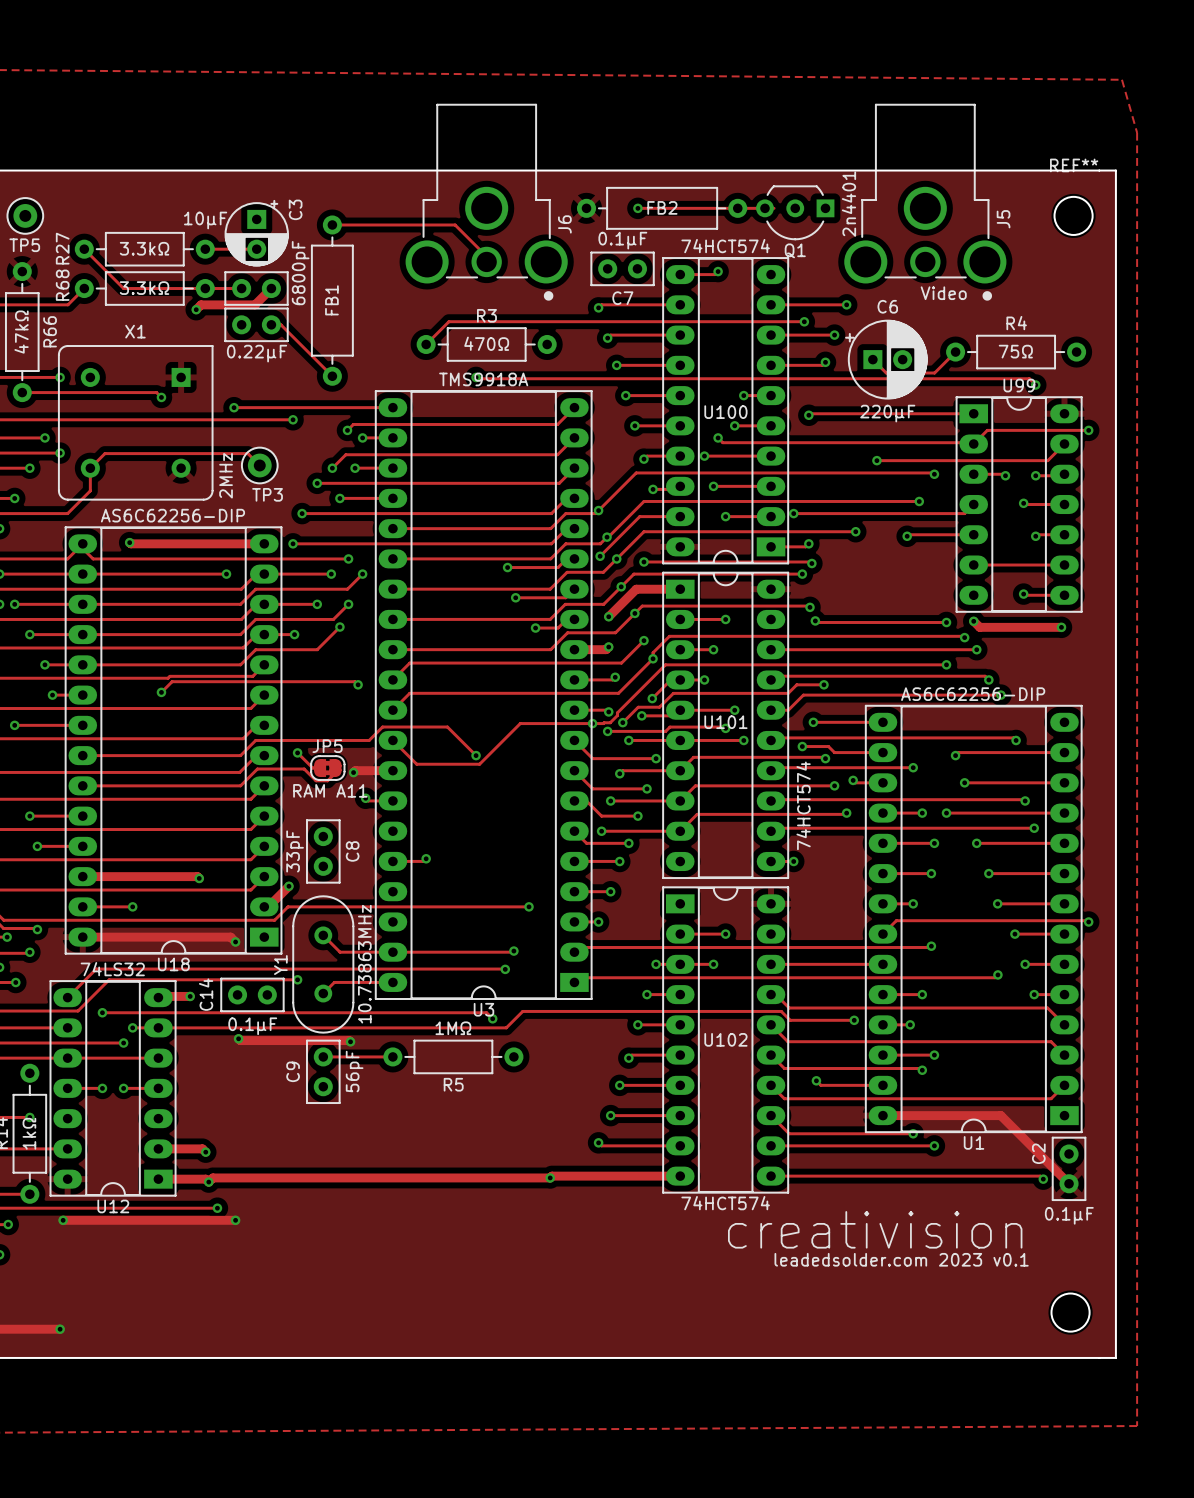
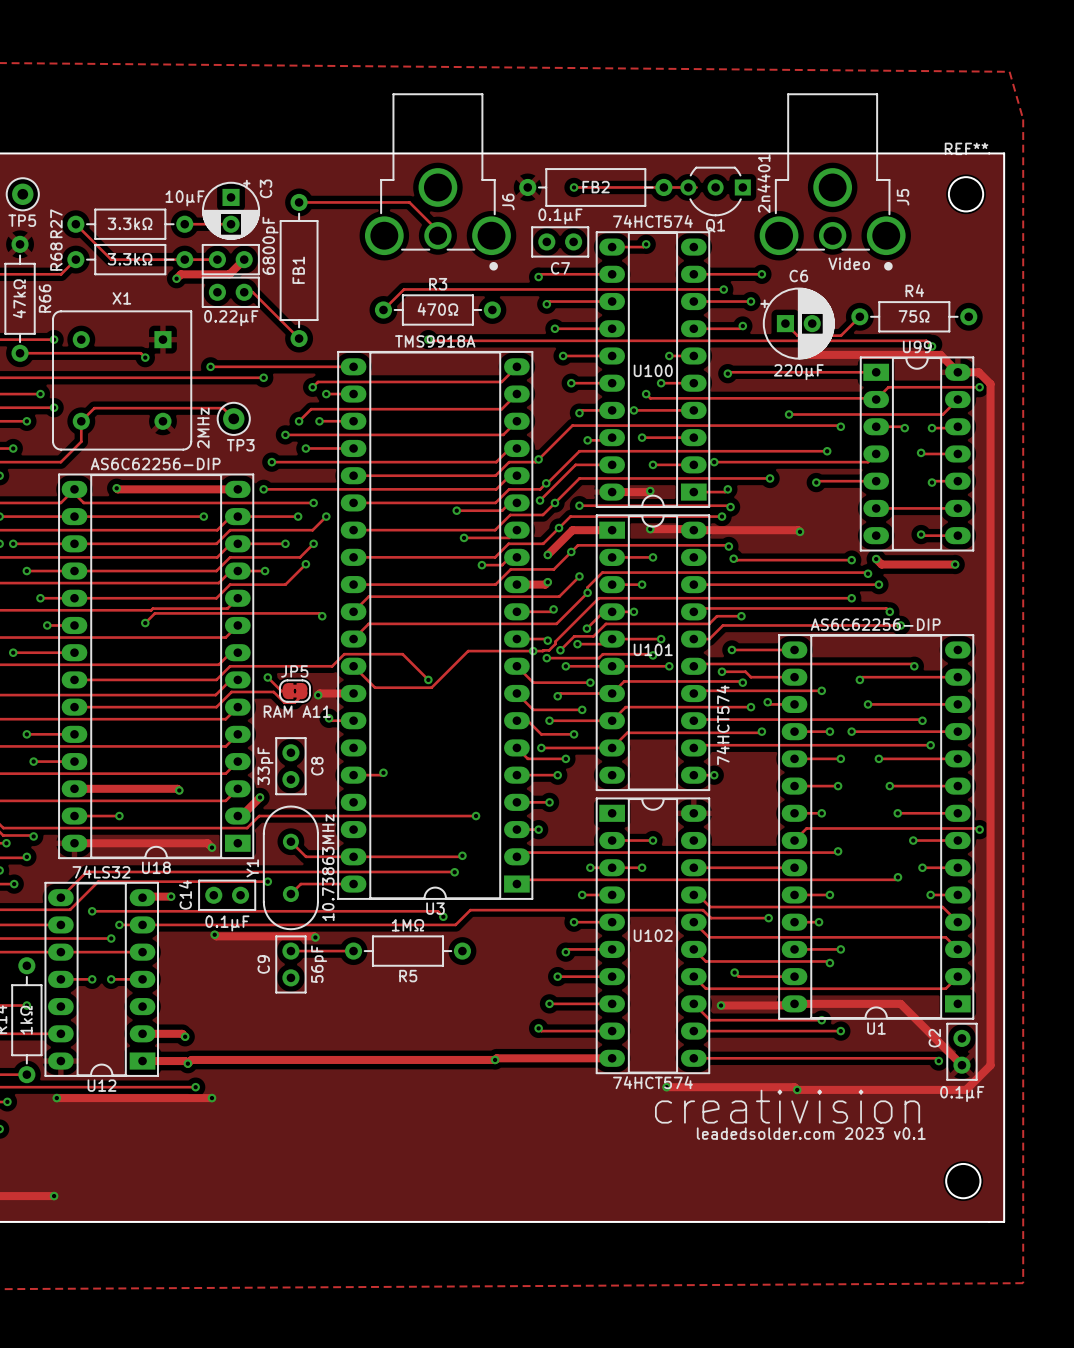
track: none -> (805, 354) (940, 354) (957, 372) (978, 372) (990, 384) (990, 1065) (966, 1089) (797, 1089) (794, 1087) (666, 1087)
track: none -> (650, 491) (612, 492)
via: none -> (650, 491)
track: none -> (650, 529) (798, 530) (799, 531)
via: none -> (650, 529)
via: none -> (799, 531)
track: none -> (794, 1003) (792, 1005) (721, 1005)
via: none -> (721, 1005)
via: none -> (666, 1087)
via: none -> (797, 1089)

